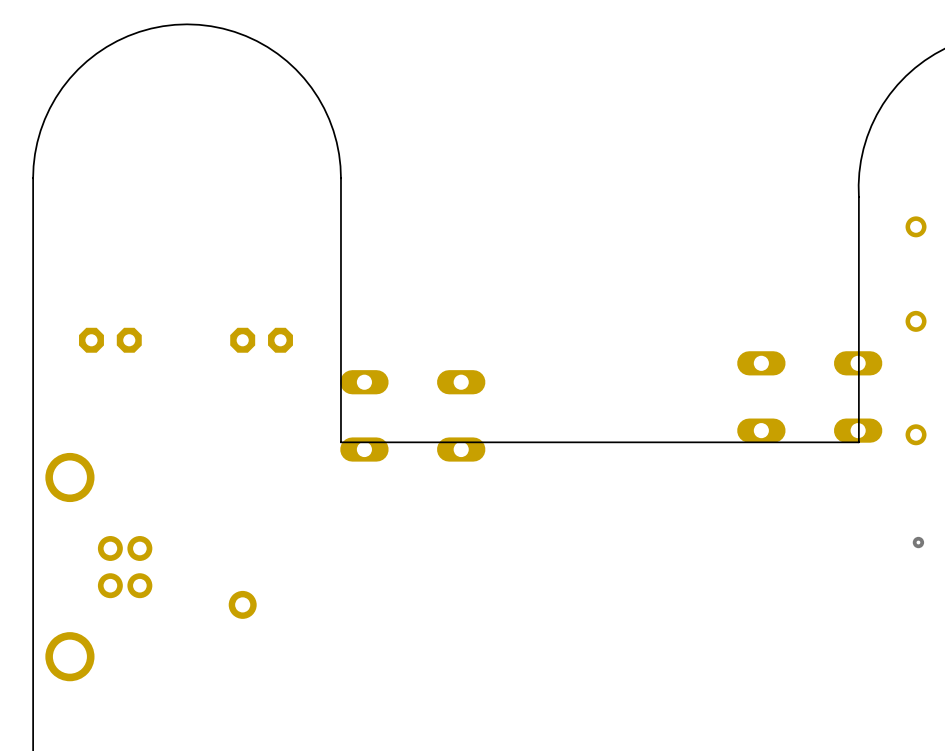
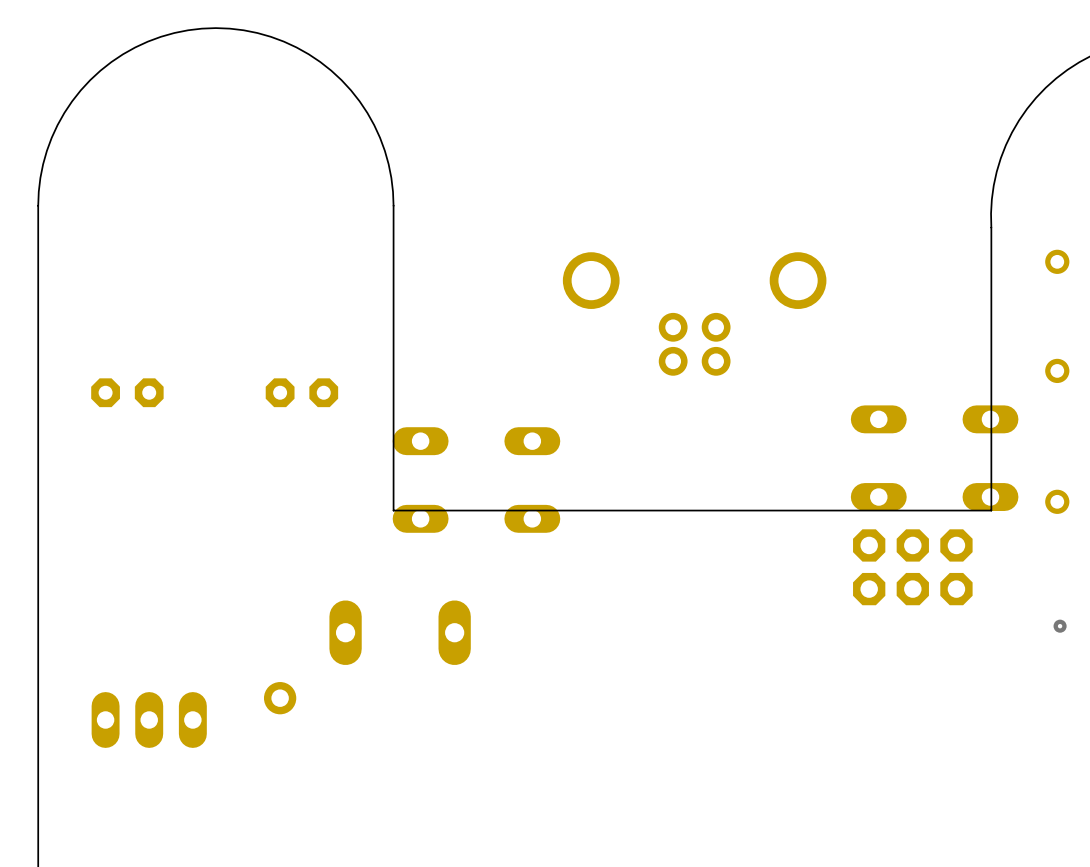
part: none -> (694, 313)
part: none -> (912, 567)
part: none -> (345, 632)
part: none -> (454, 632)
part: (98, 567) -> none
part: none -> (149, 719)

